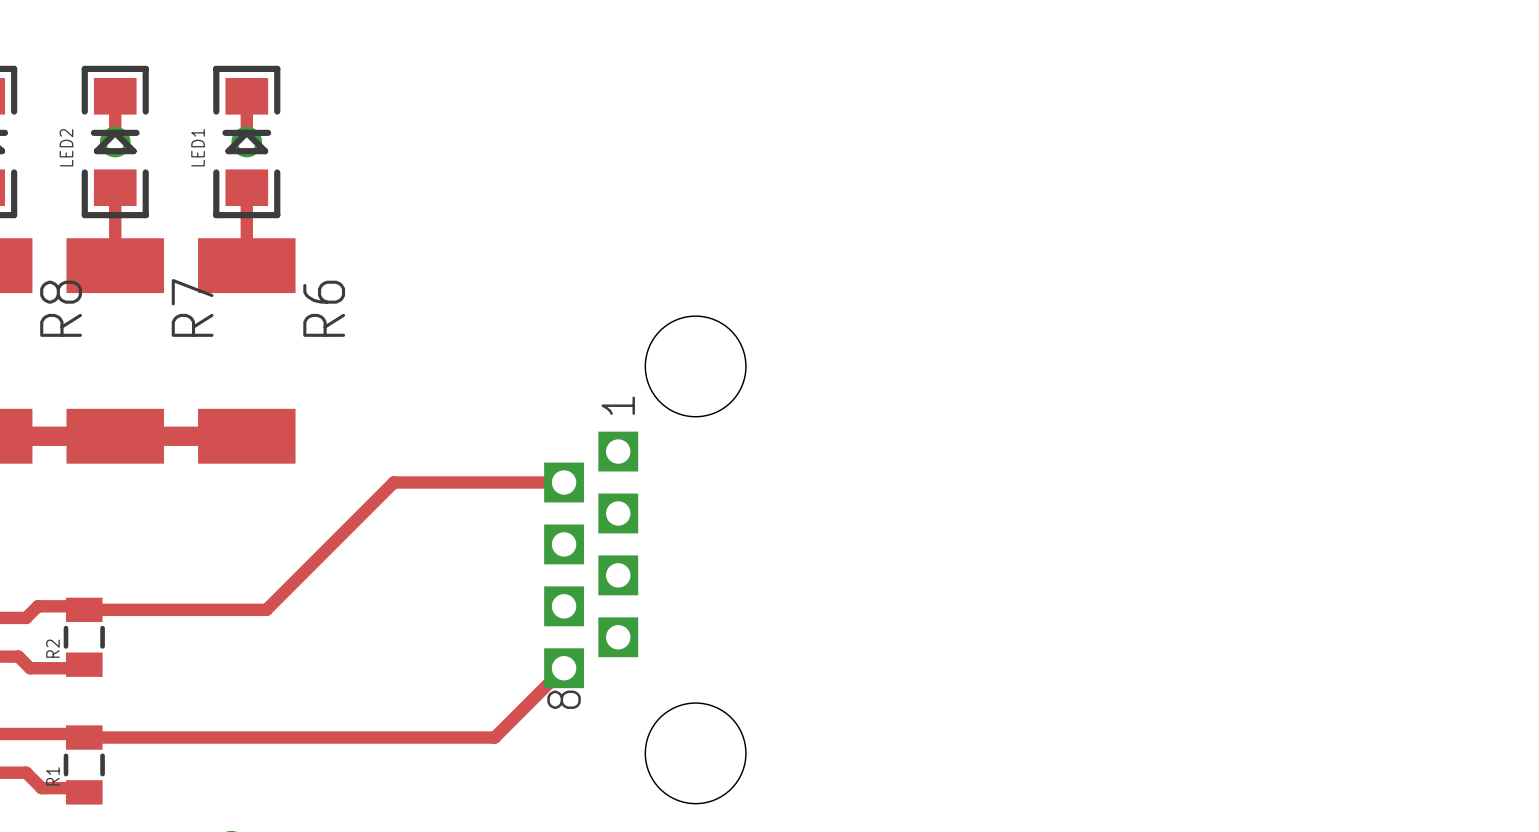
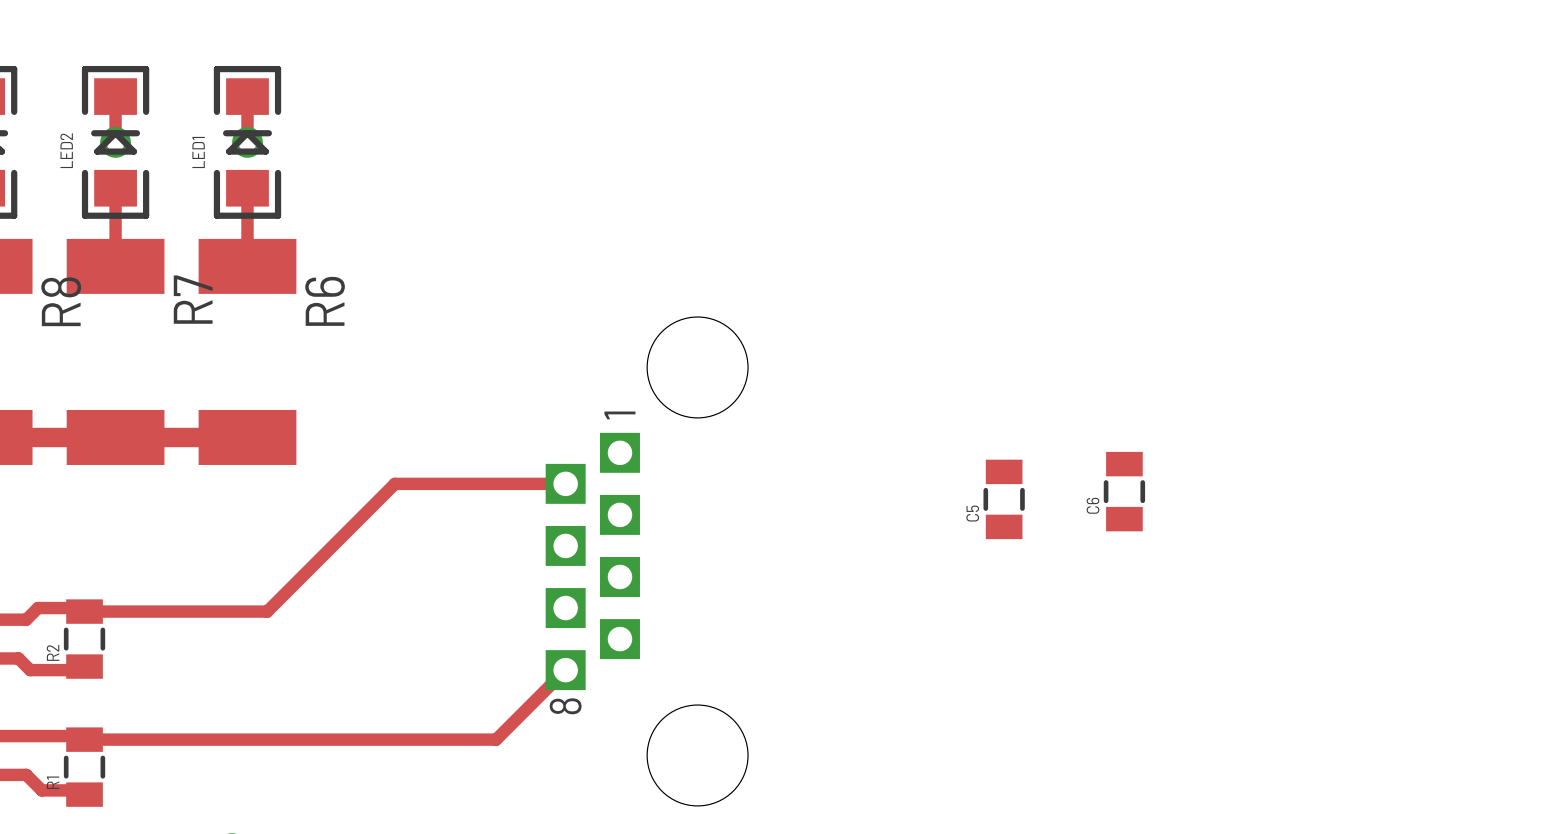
C6: none -> (1124, 491)
C5: none -> (1004, 499)

